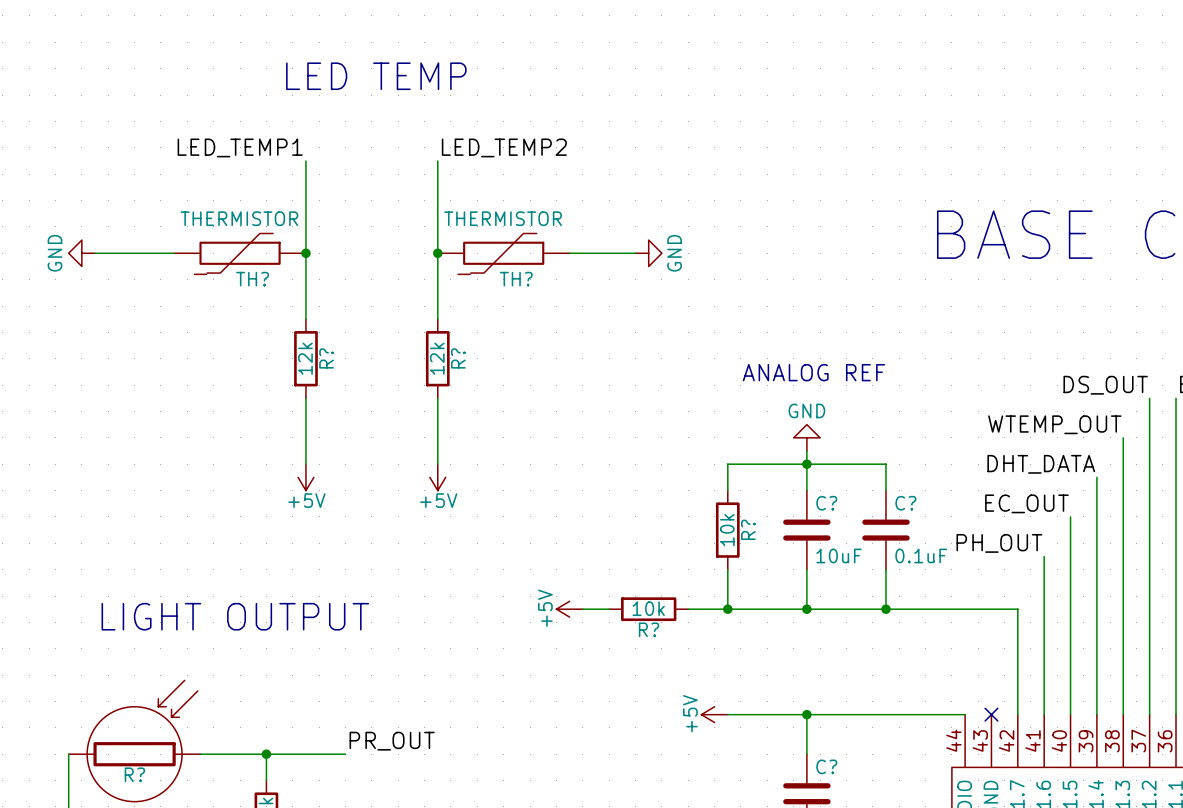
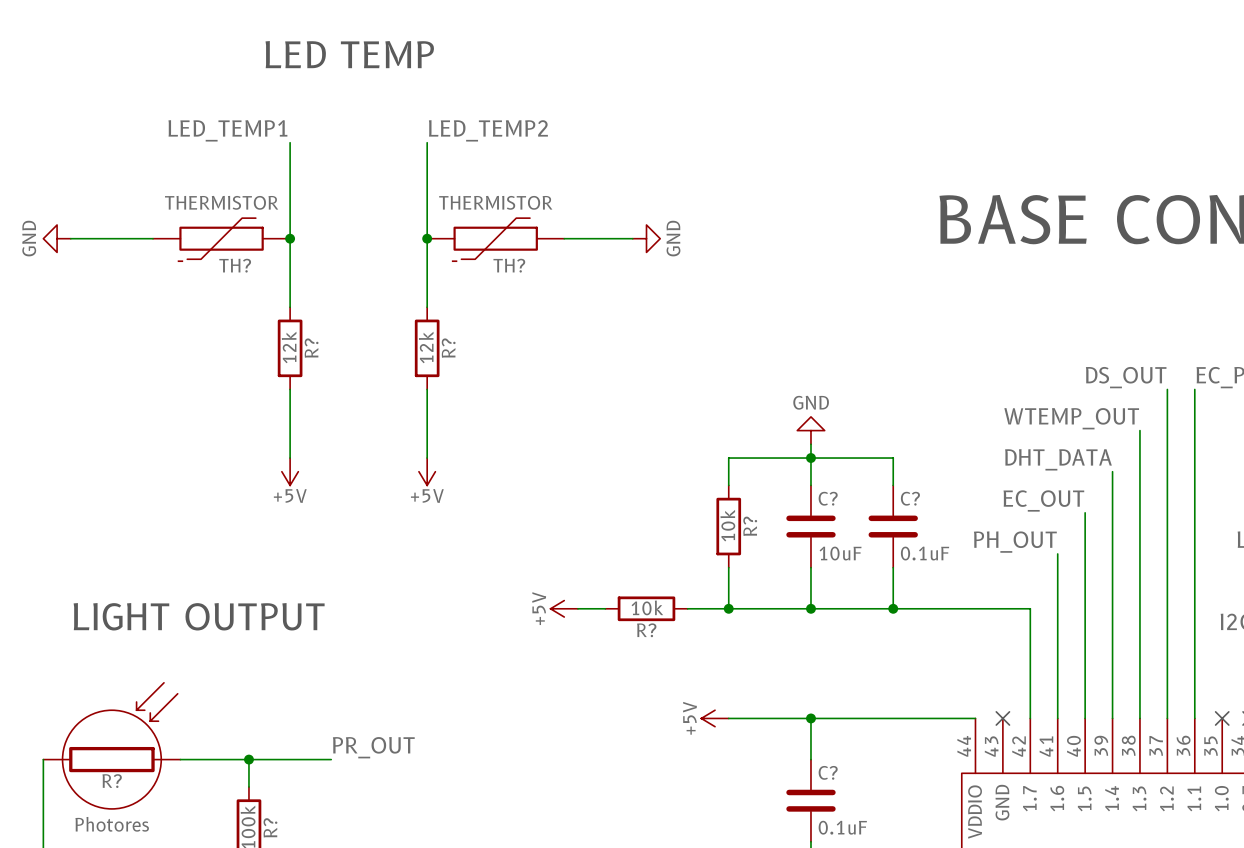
text: ANALOG REF (813, 372) -> none

